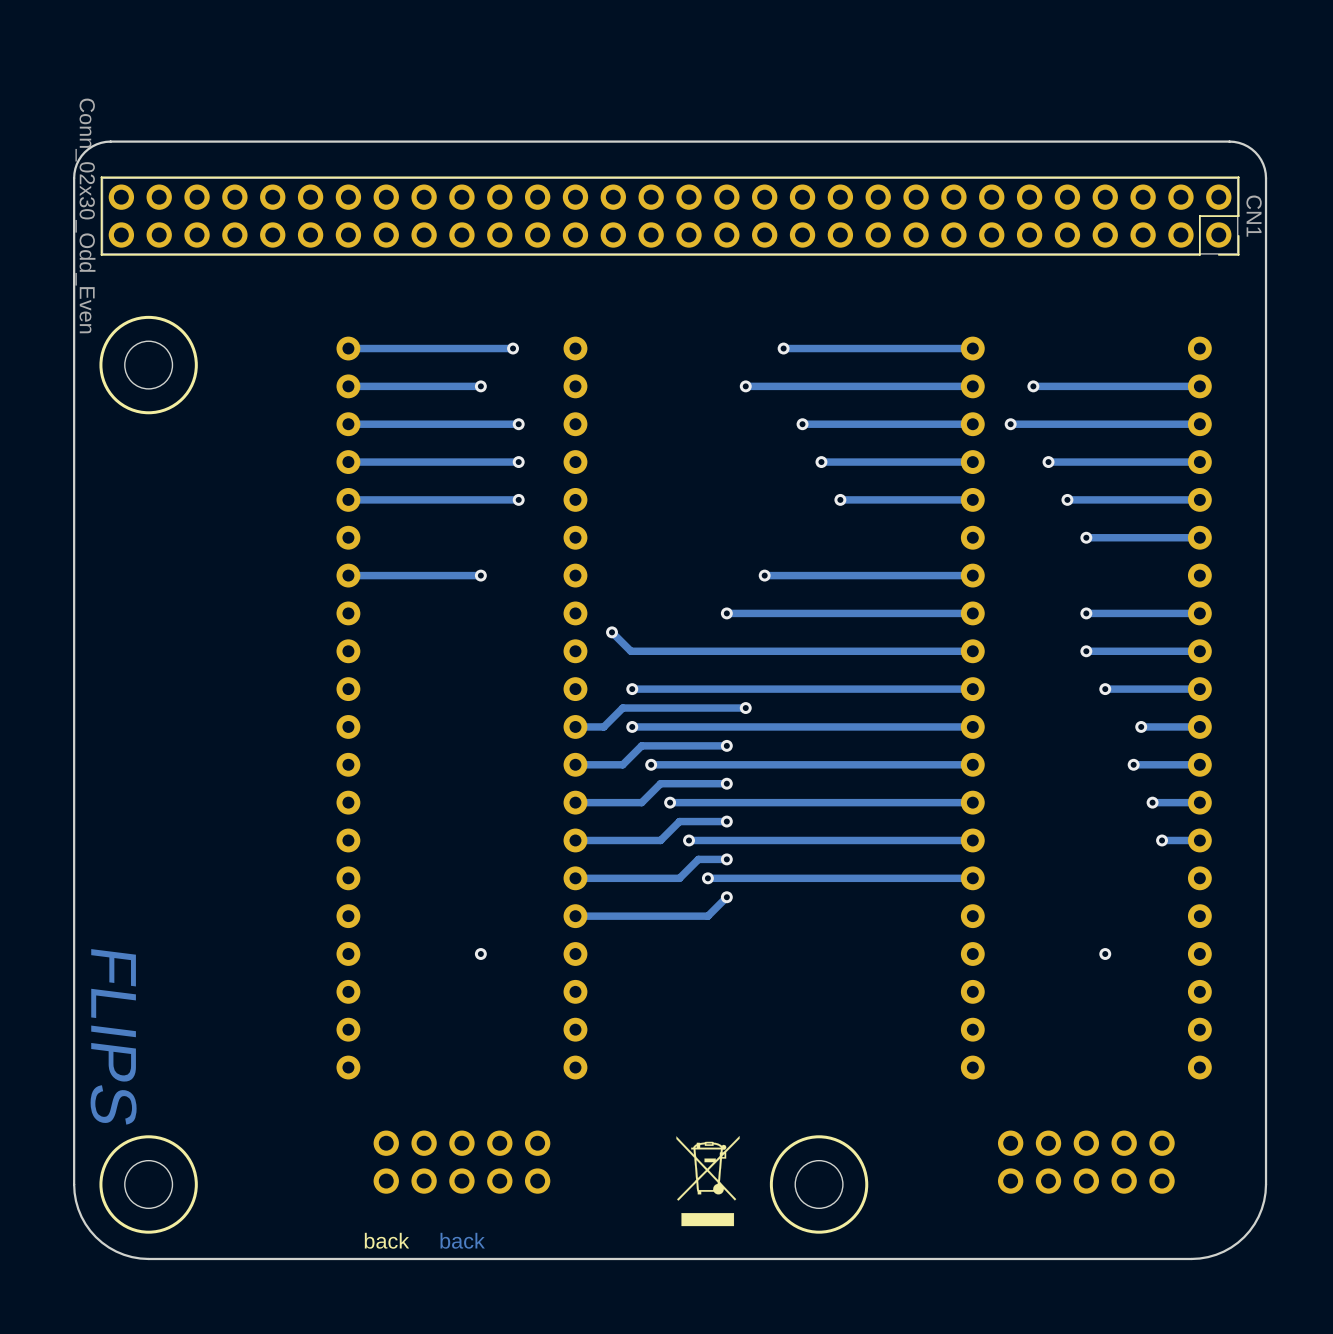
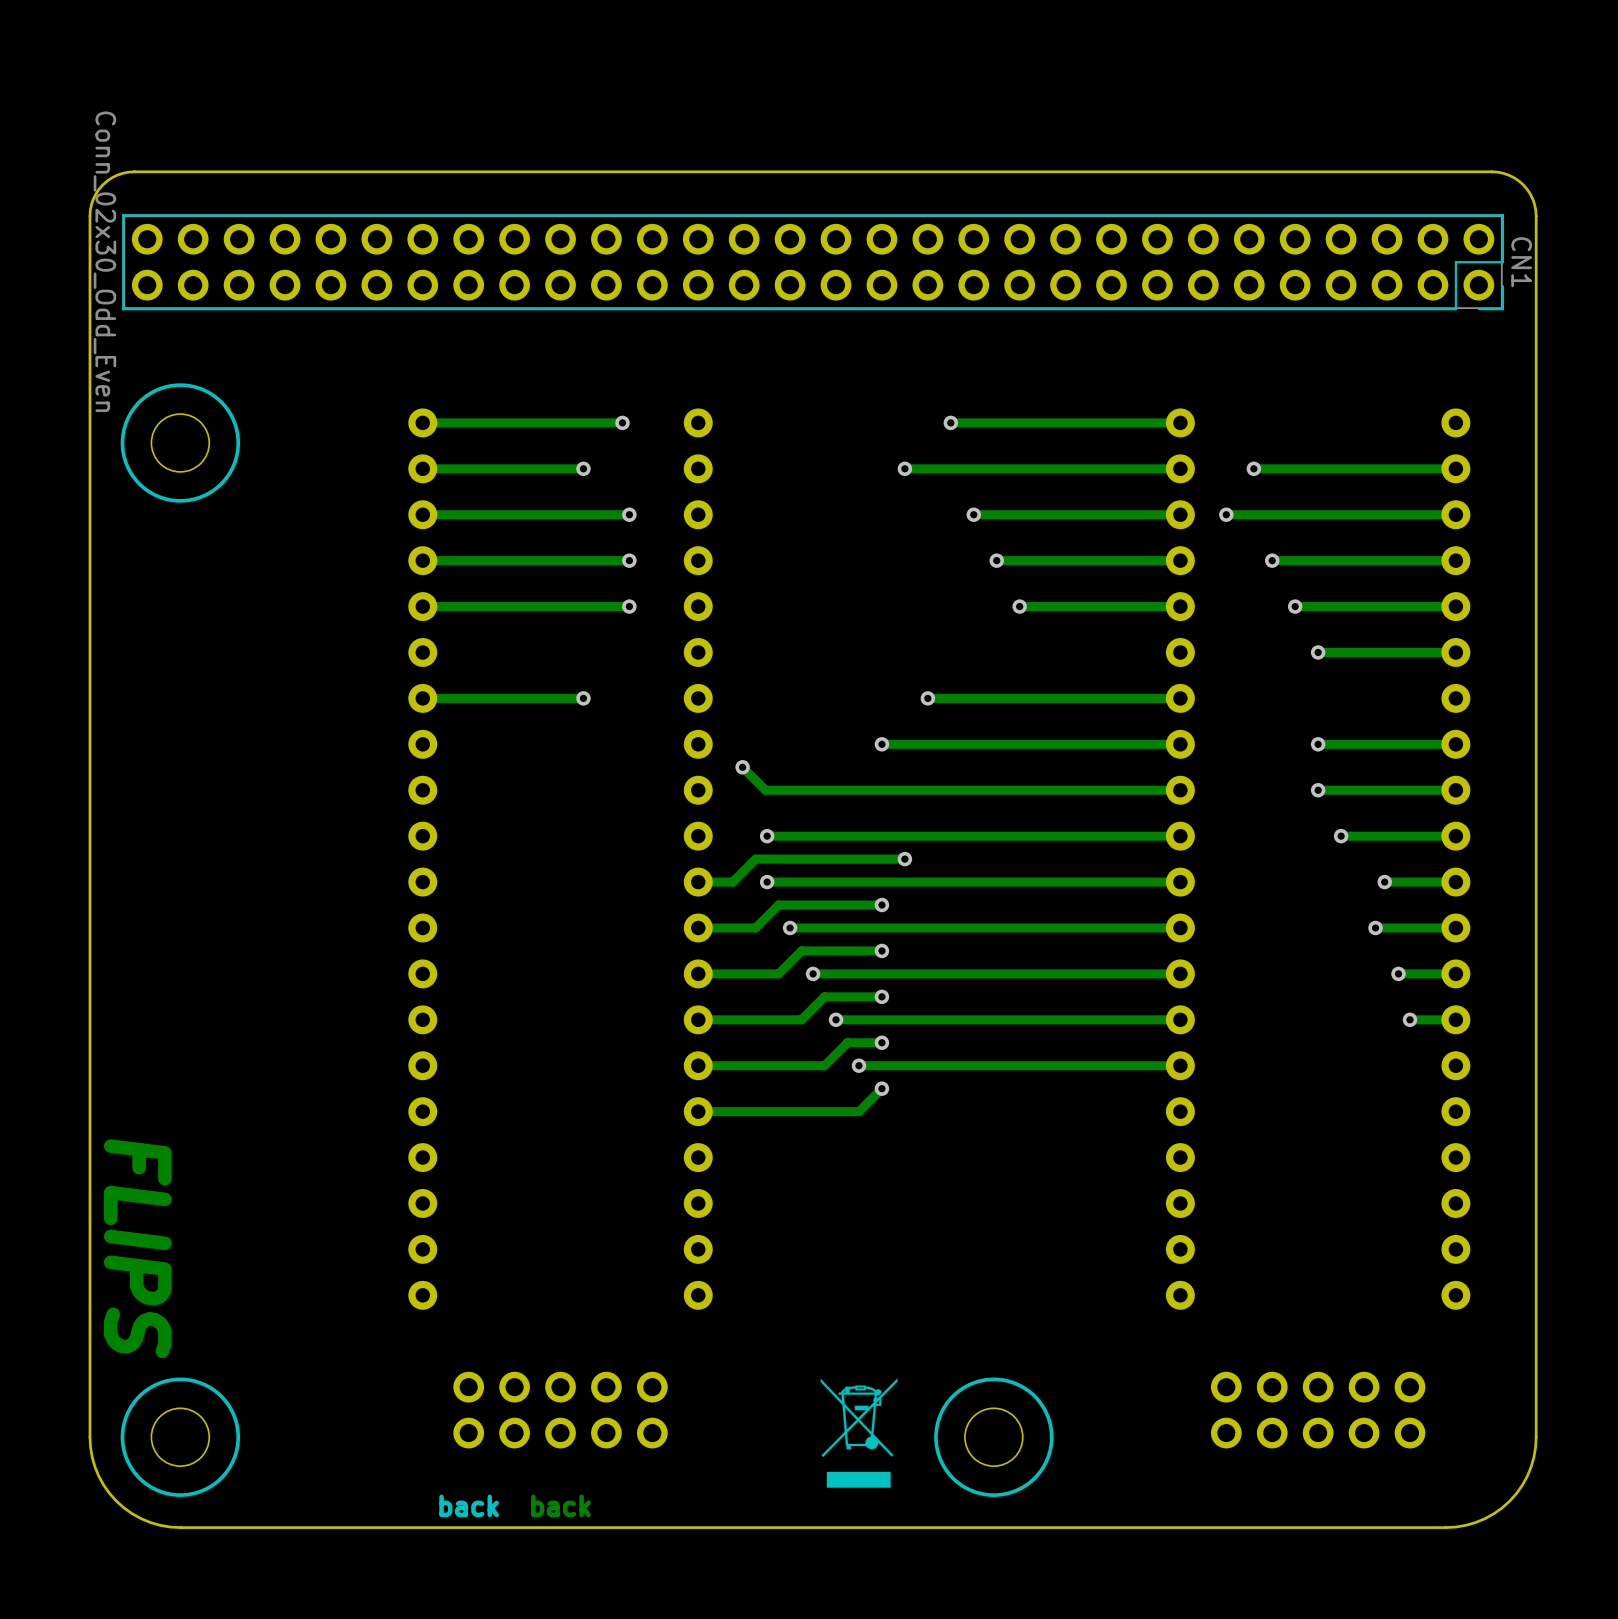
via: (480, 954) -> none
via: (1105, 954) -> none

